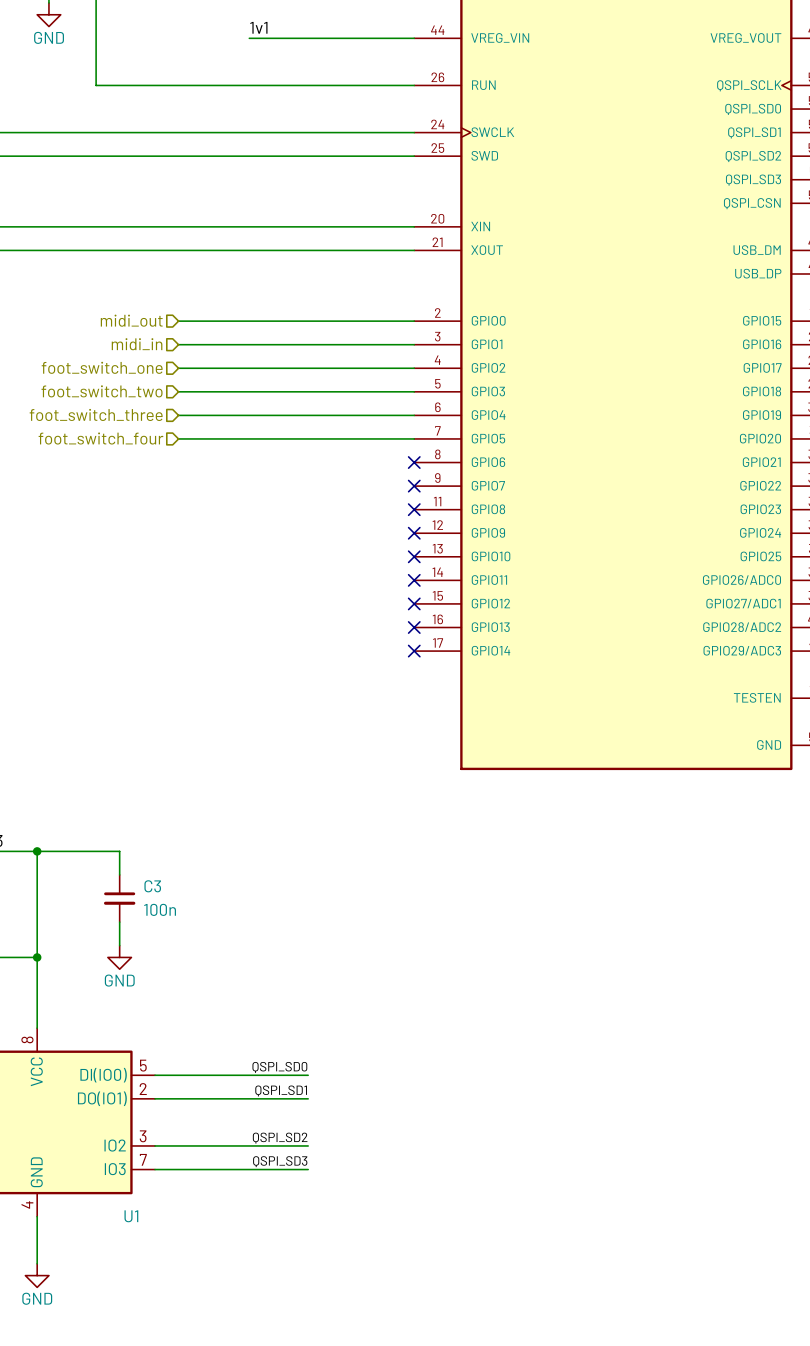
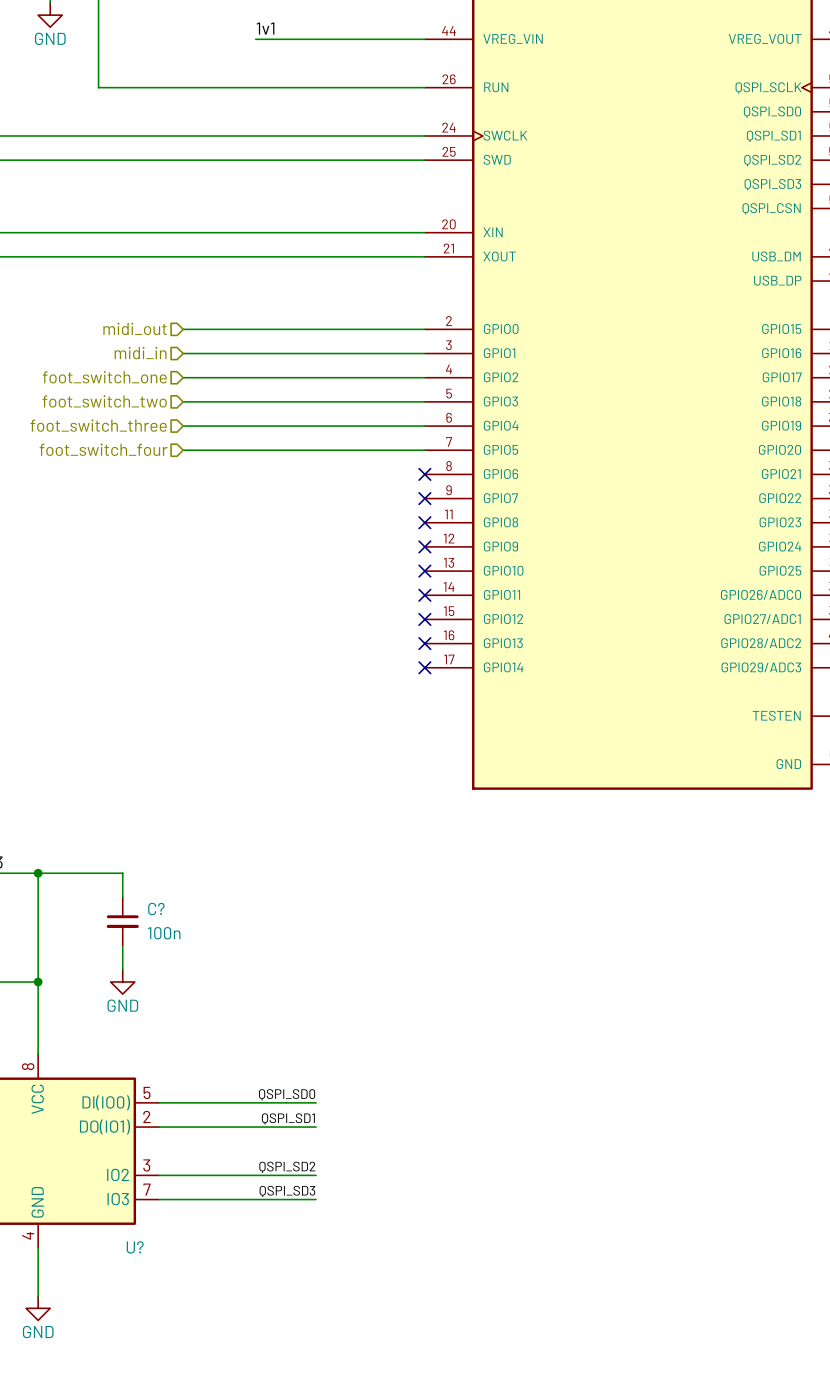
C3 name: C3 (152, 886) -> C? (156, 909)
U1 name: U1 (131, 1216) -> U? (135, 1247)

